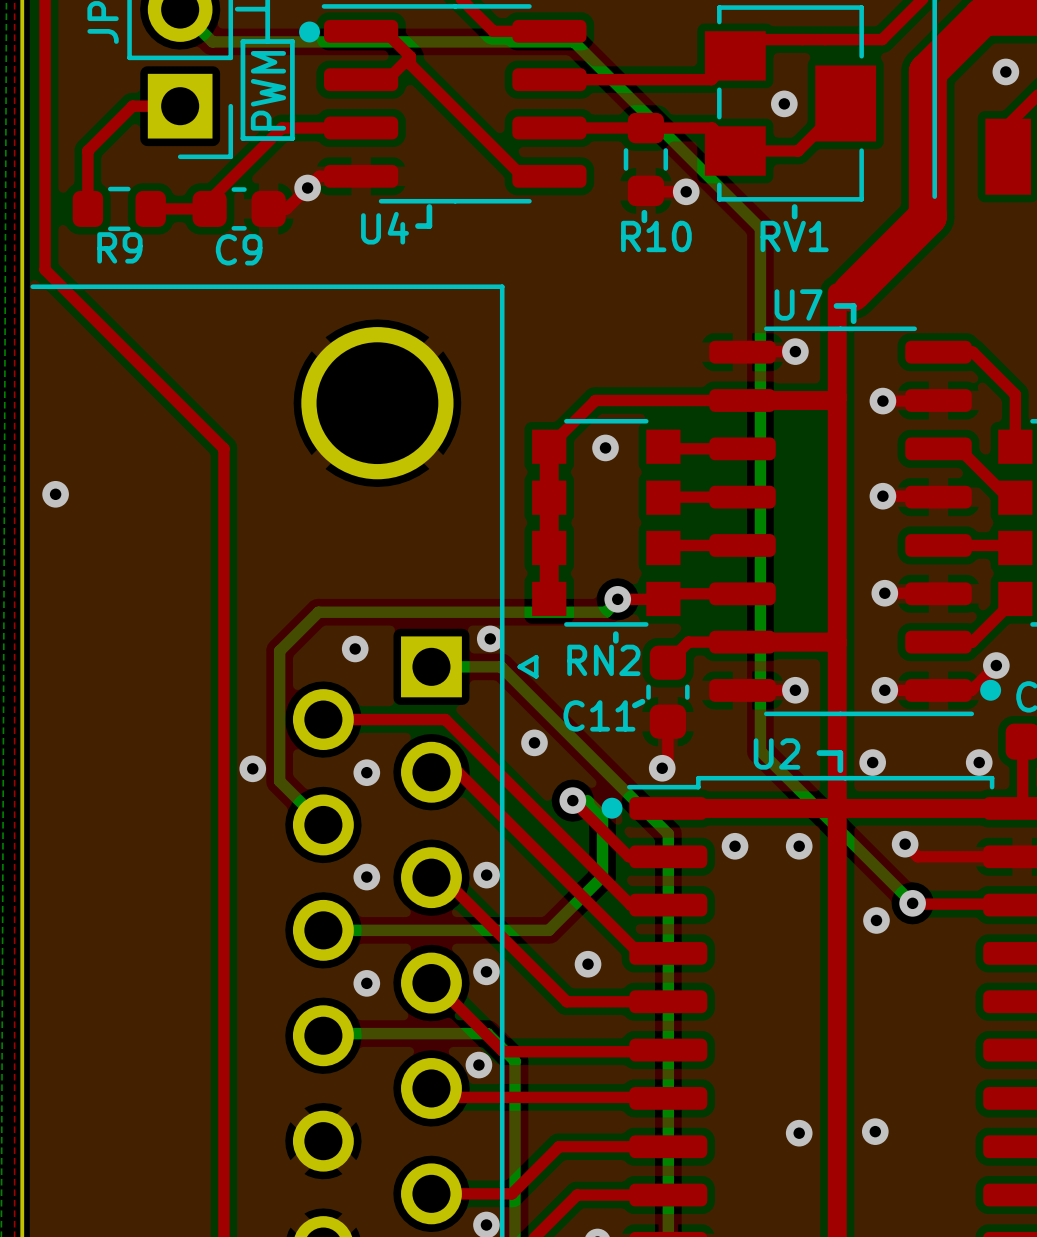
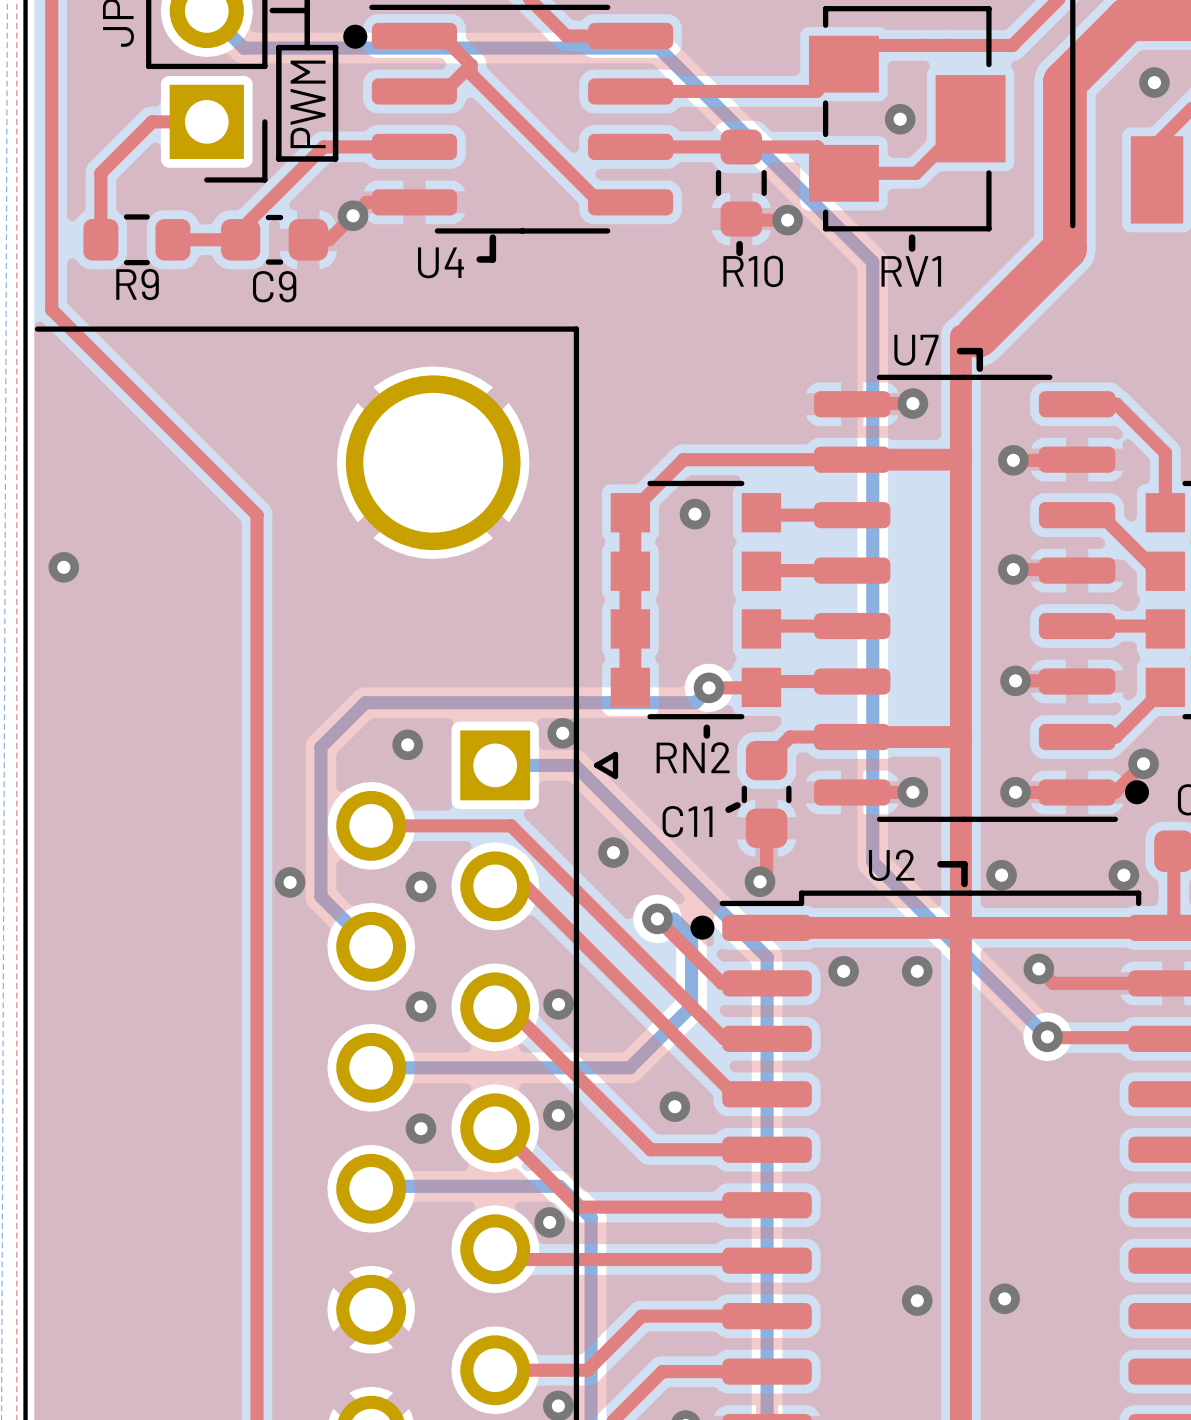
via: (876, 920) -> none

